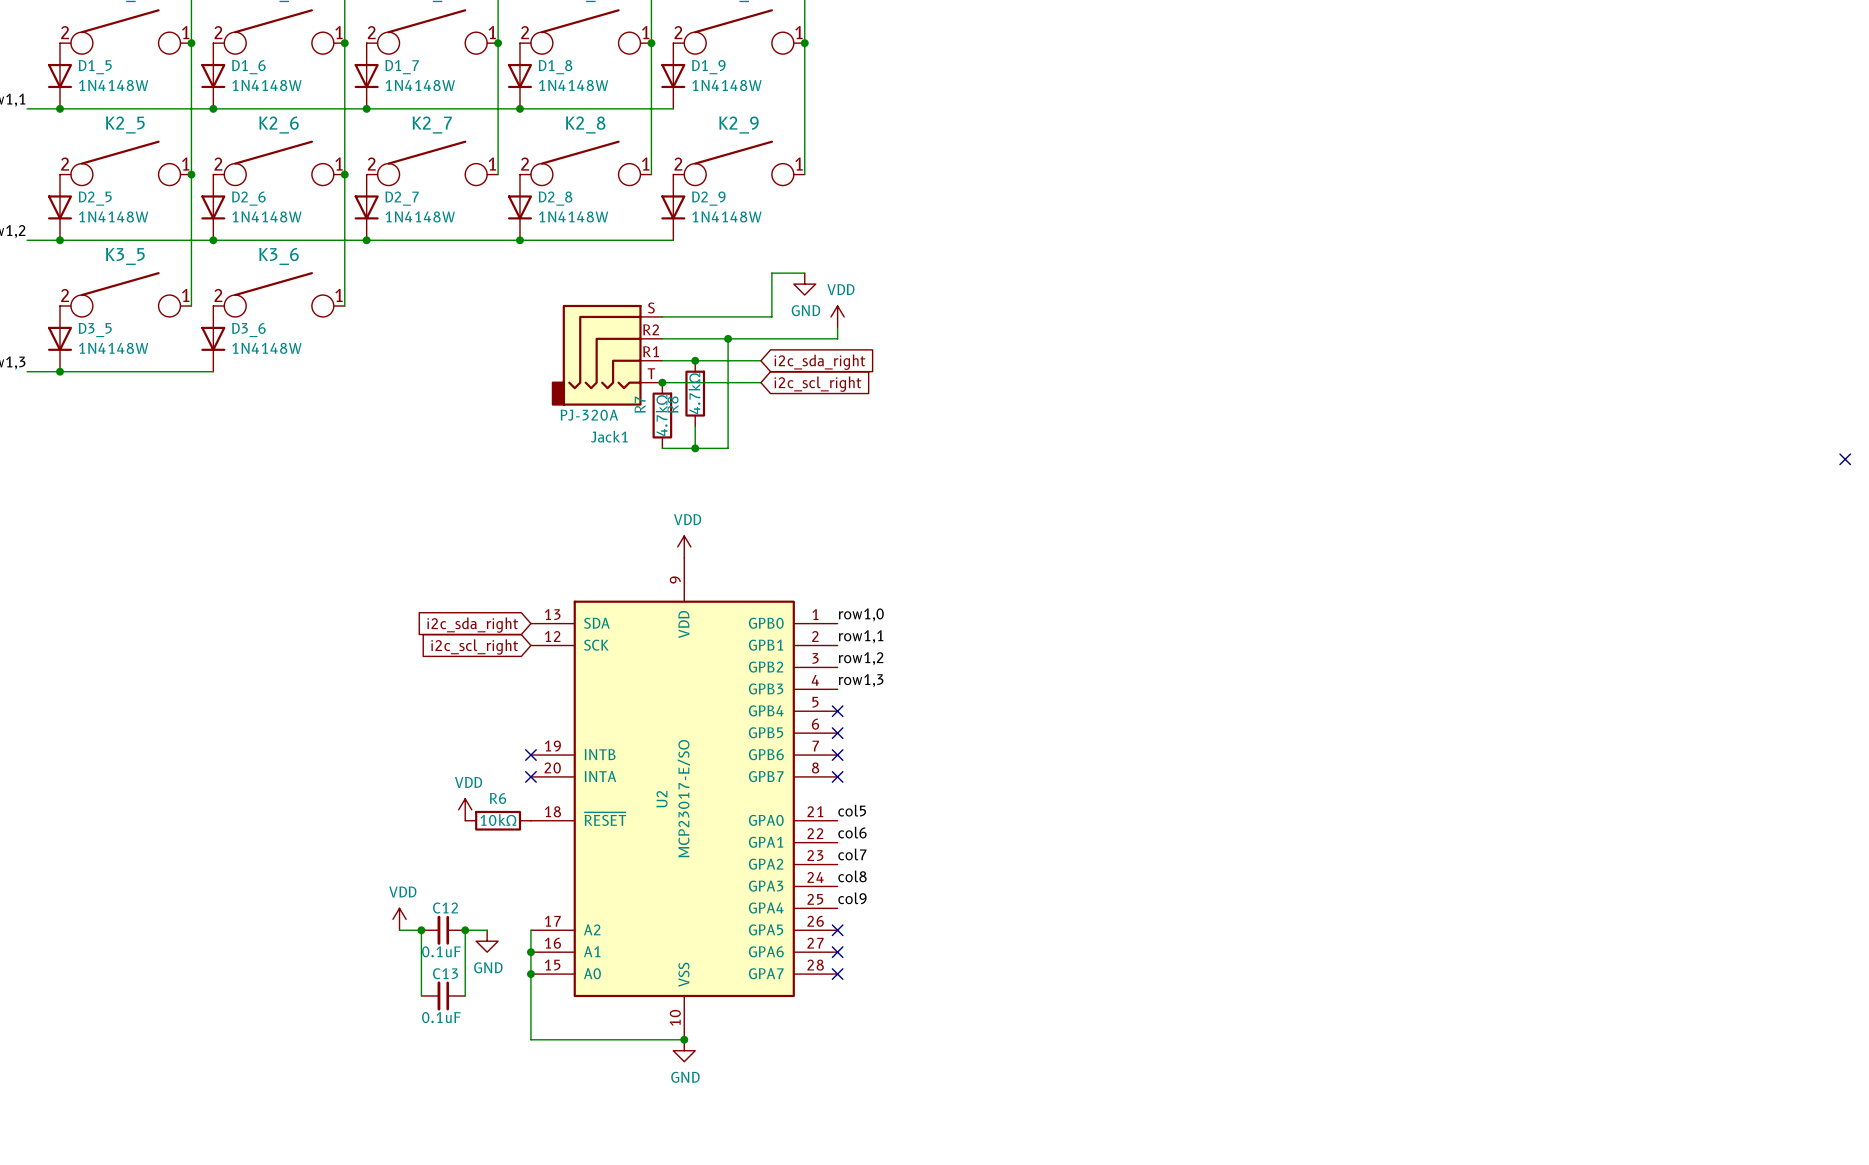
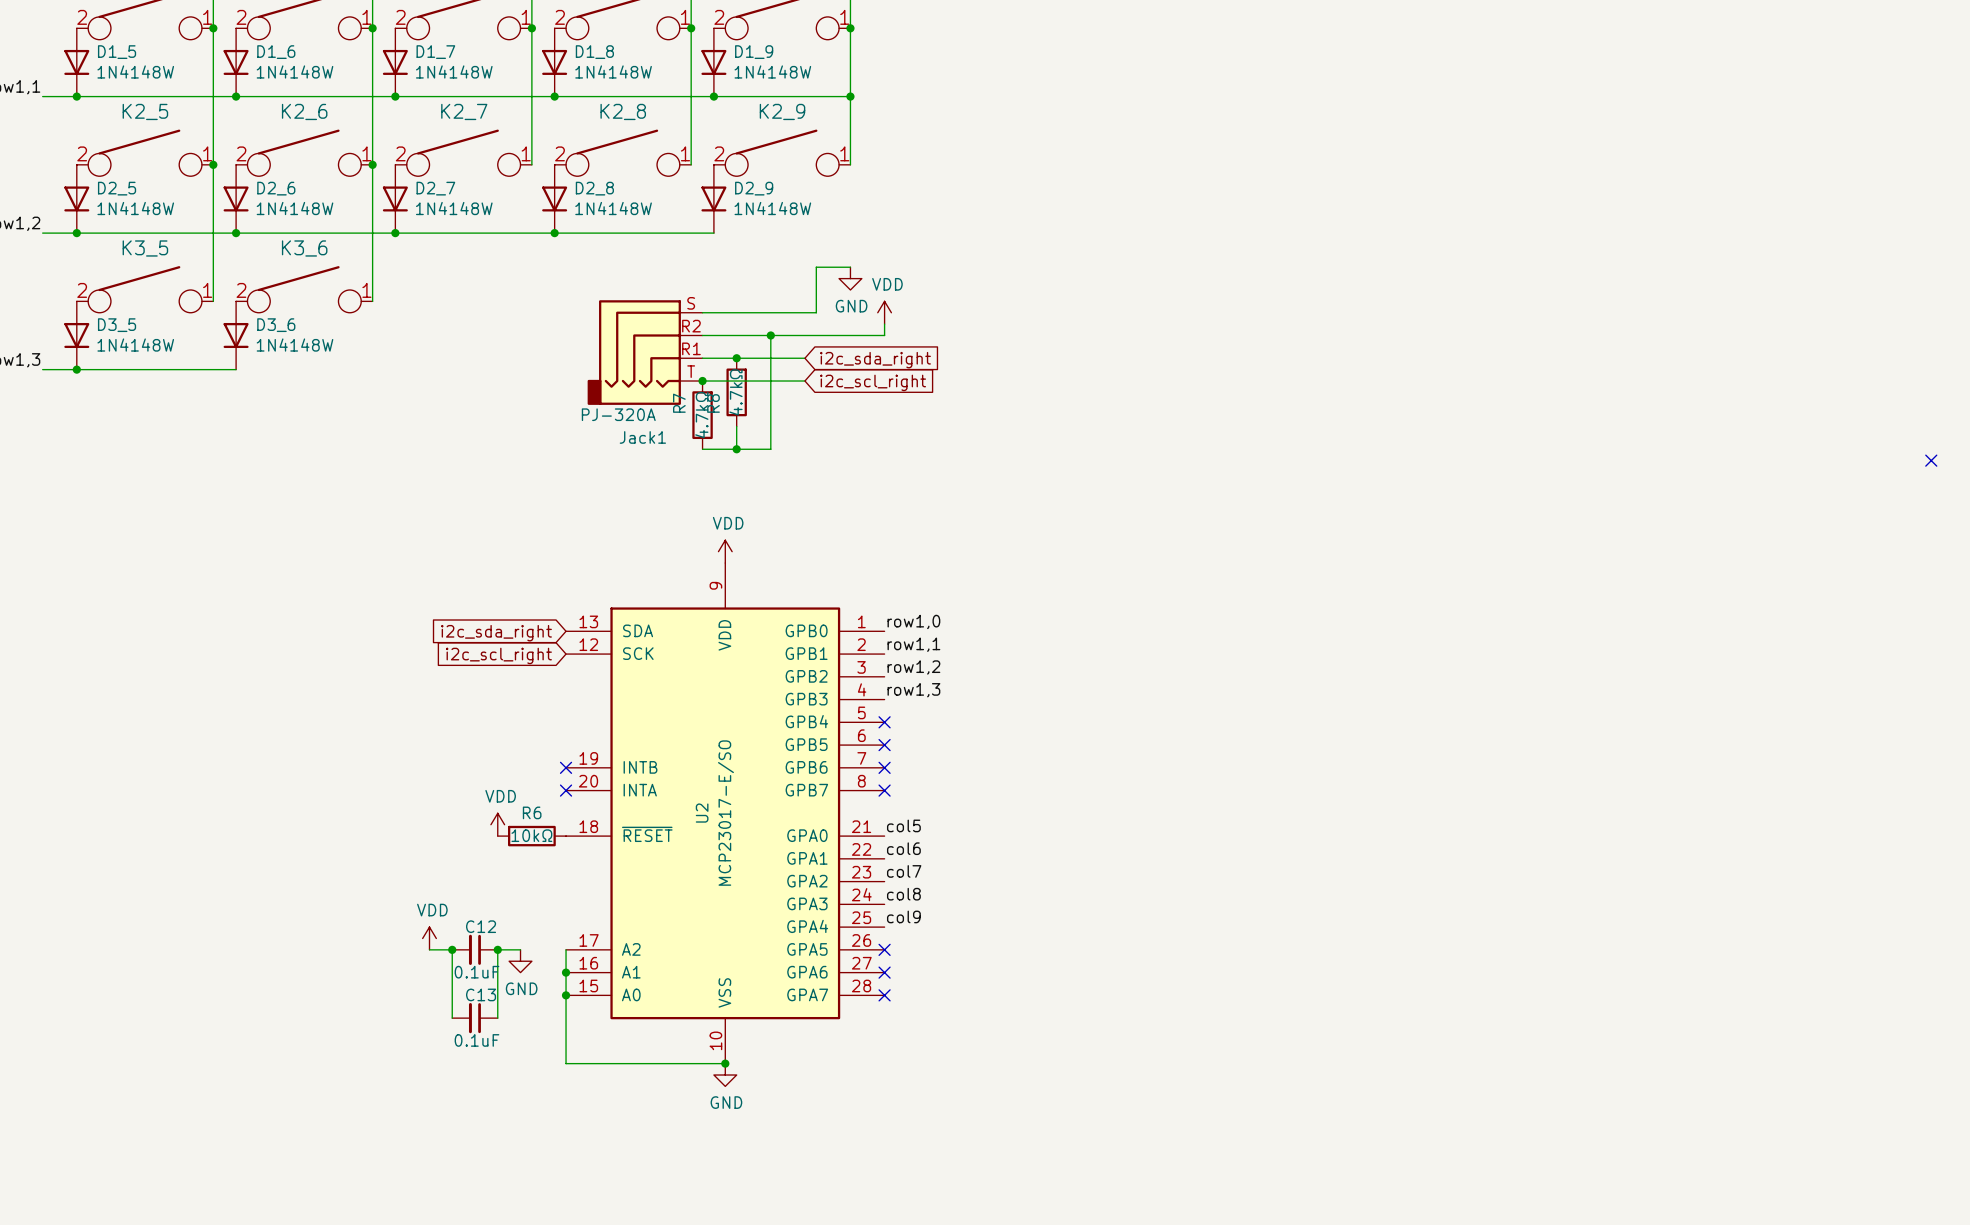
wire: none -> (713, 96) (850, 96)
junction: none -> (713, 96)
junction: none -> (850, 96)

